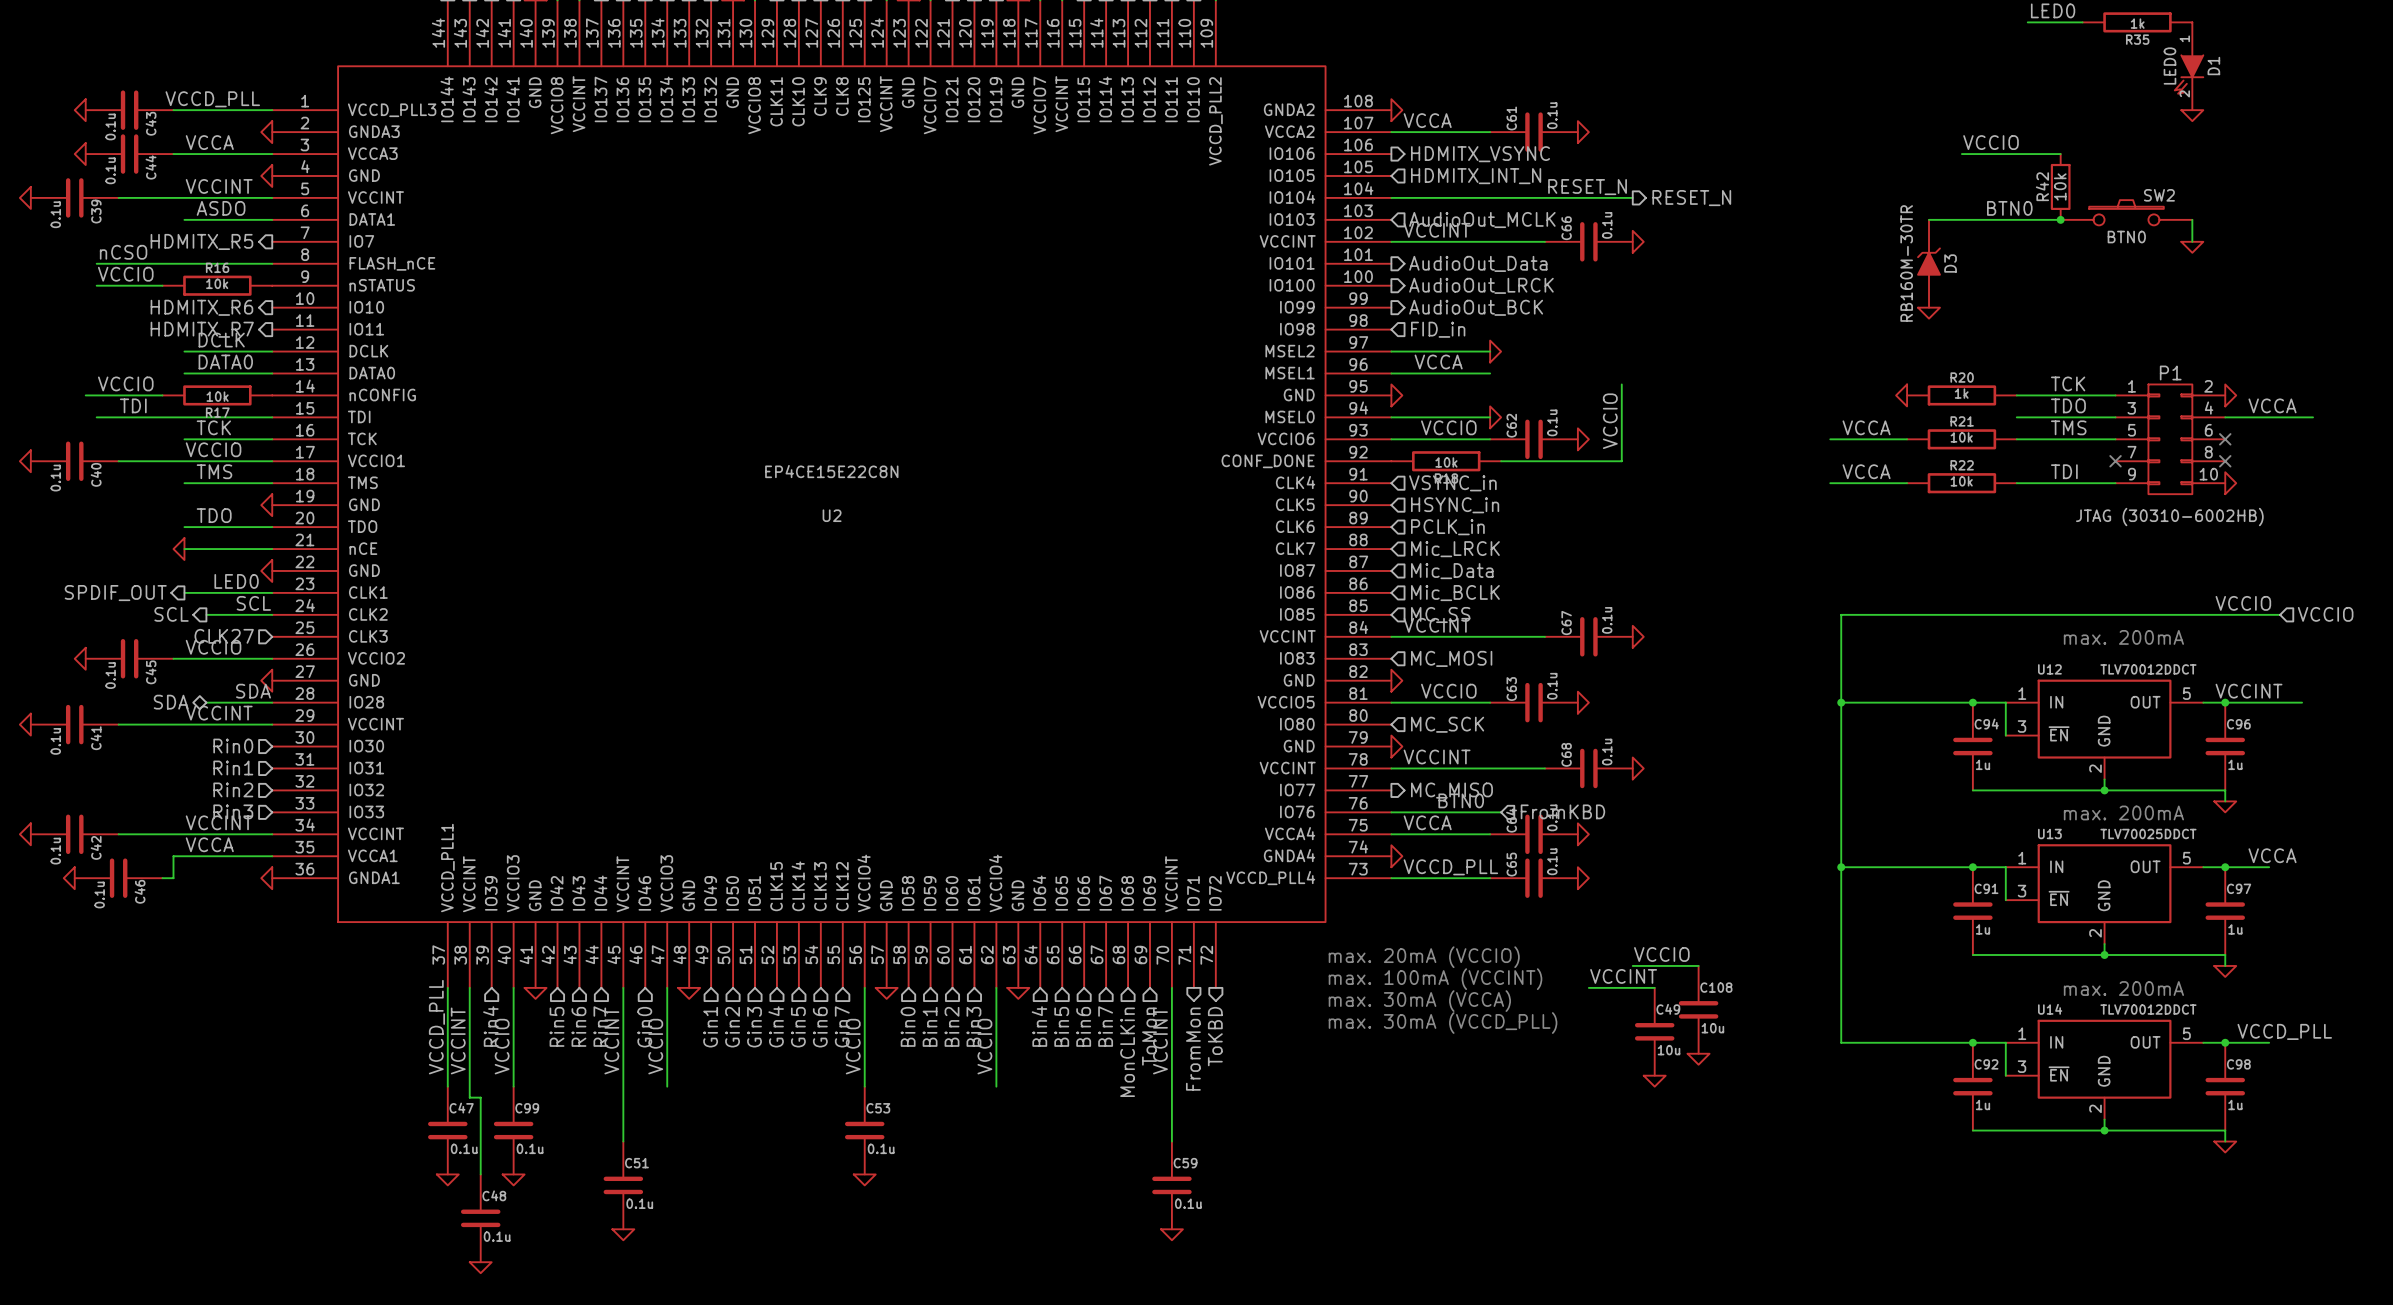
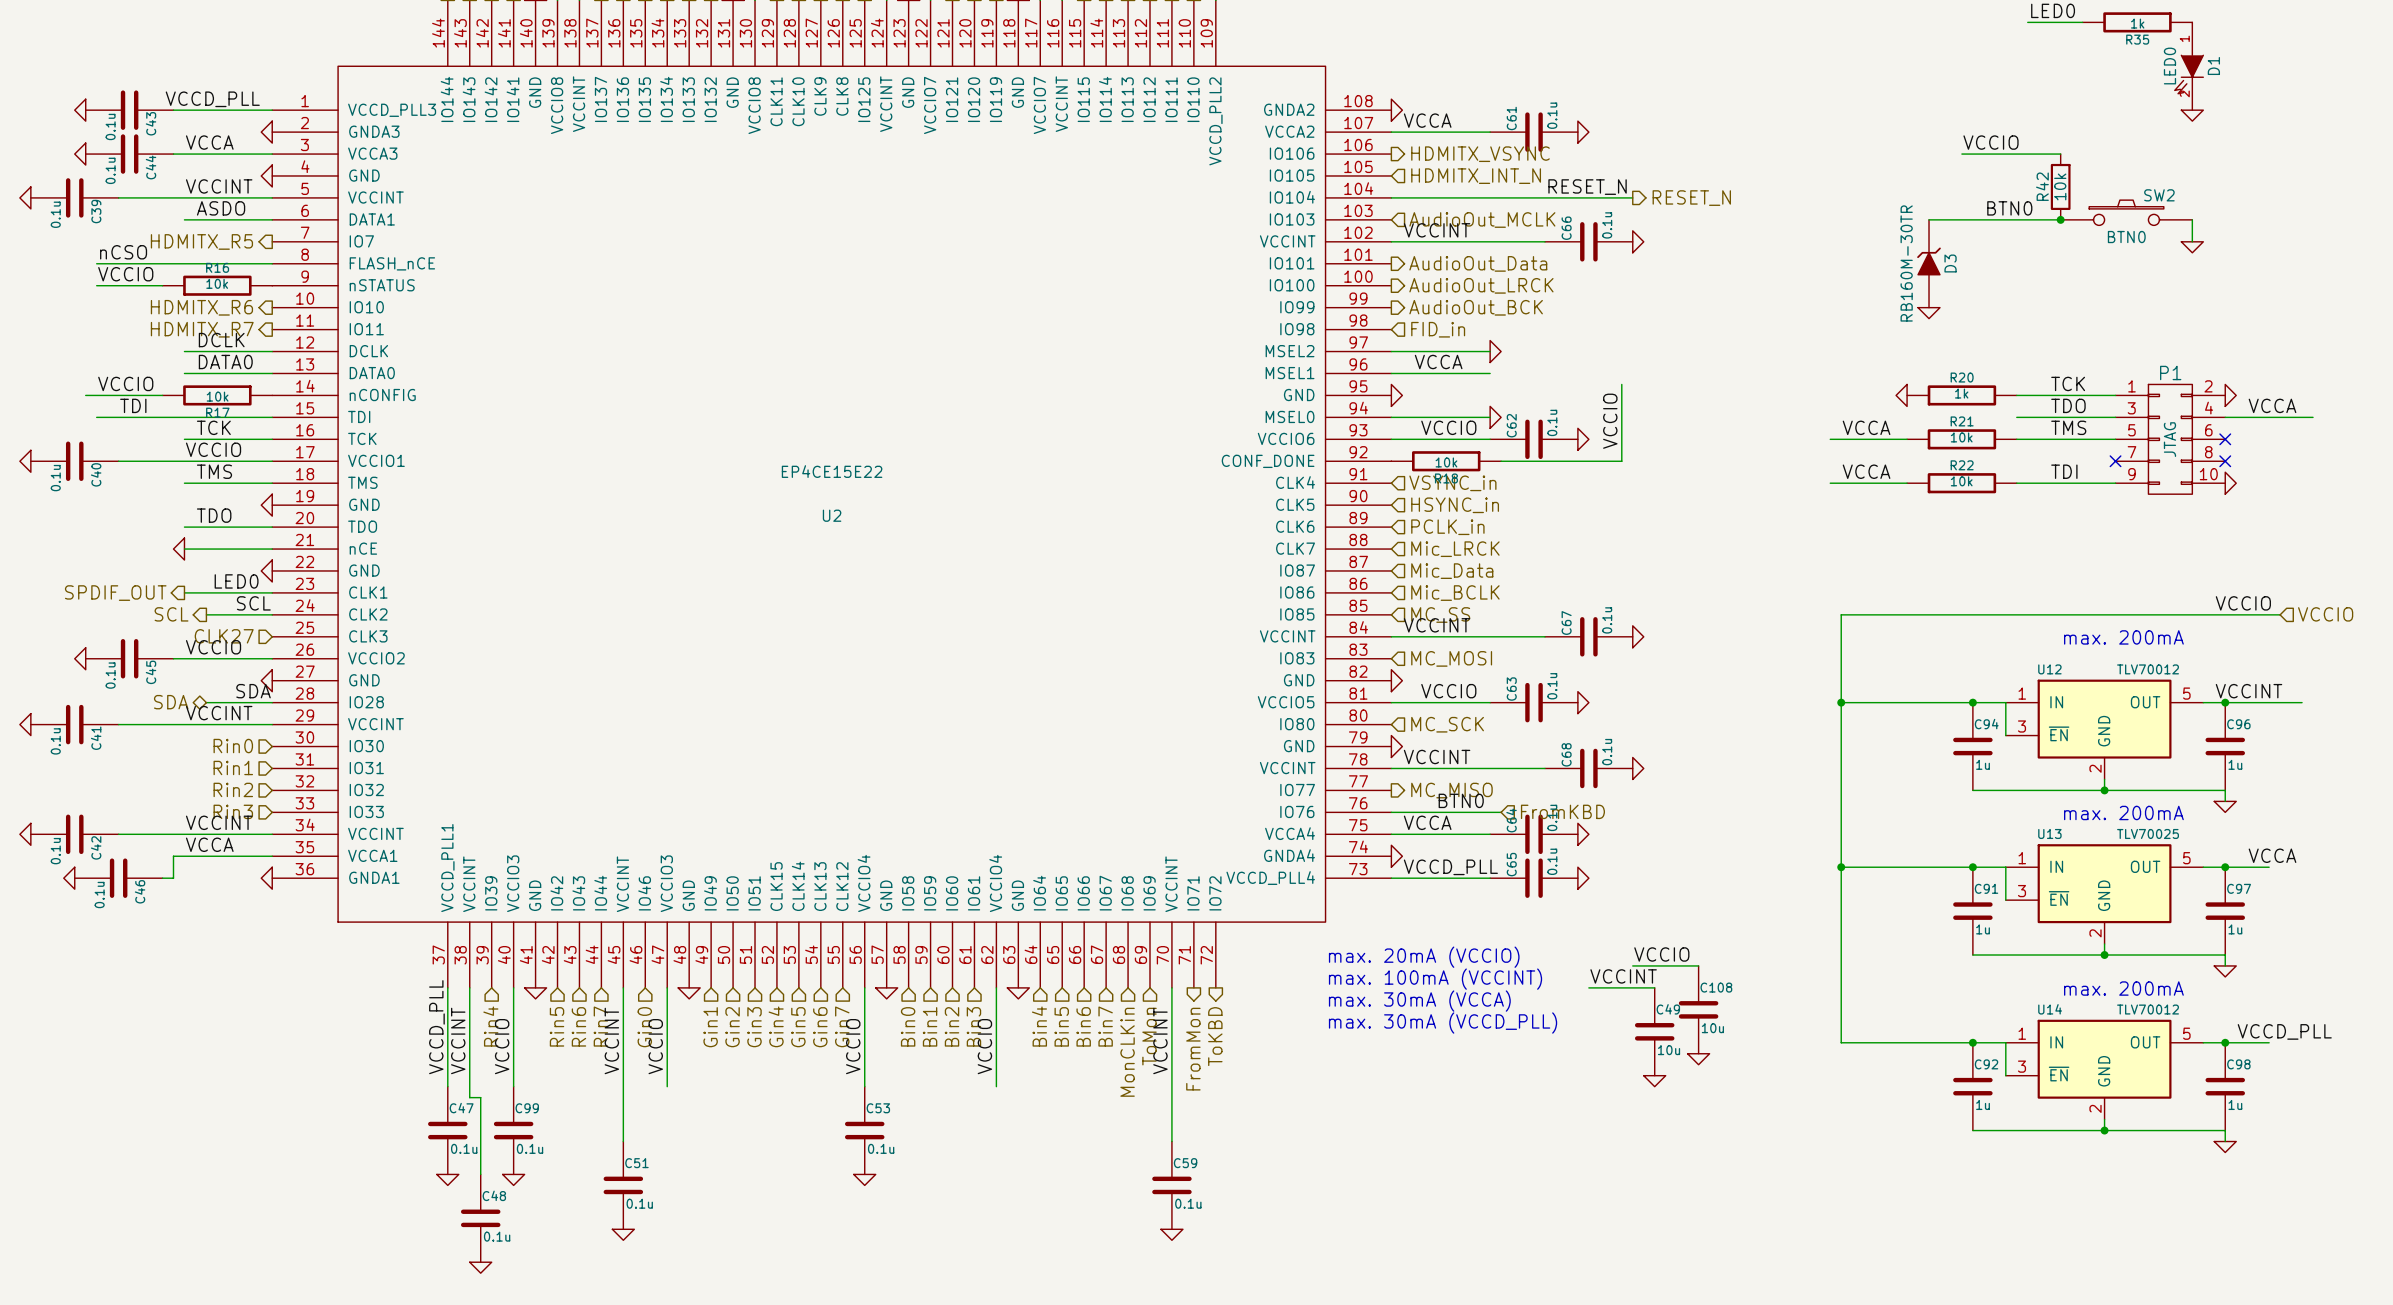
U2 value: EP4CE15E22C8N (831, 471) -> EP4CE15E22 (832, 471)
P1 value: JTAG (30310-6002HB) (2169, 517) -> JTAG (2169, 439)
U12 value: TLV70012DDCT (2148, 669) -> TLV70012 (2148, 669)
U13 value: TLV70025DDCT (2148, 833) -> TLV70025 (2148, 833)
U14 value: TLV70012DDCT (2148, 1009) -> TLV70012 (2148, 1009)

